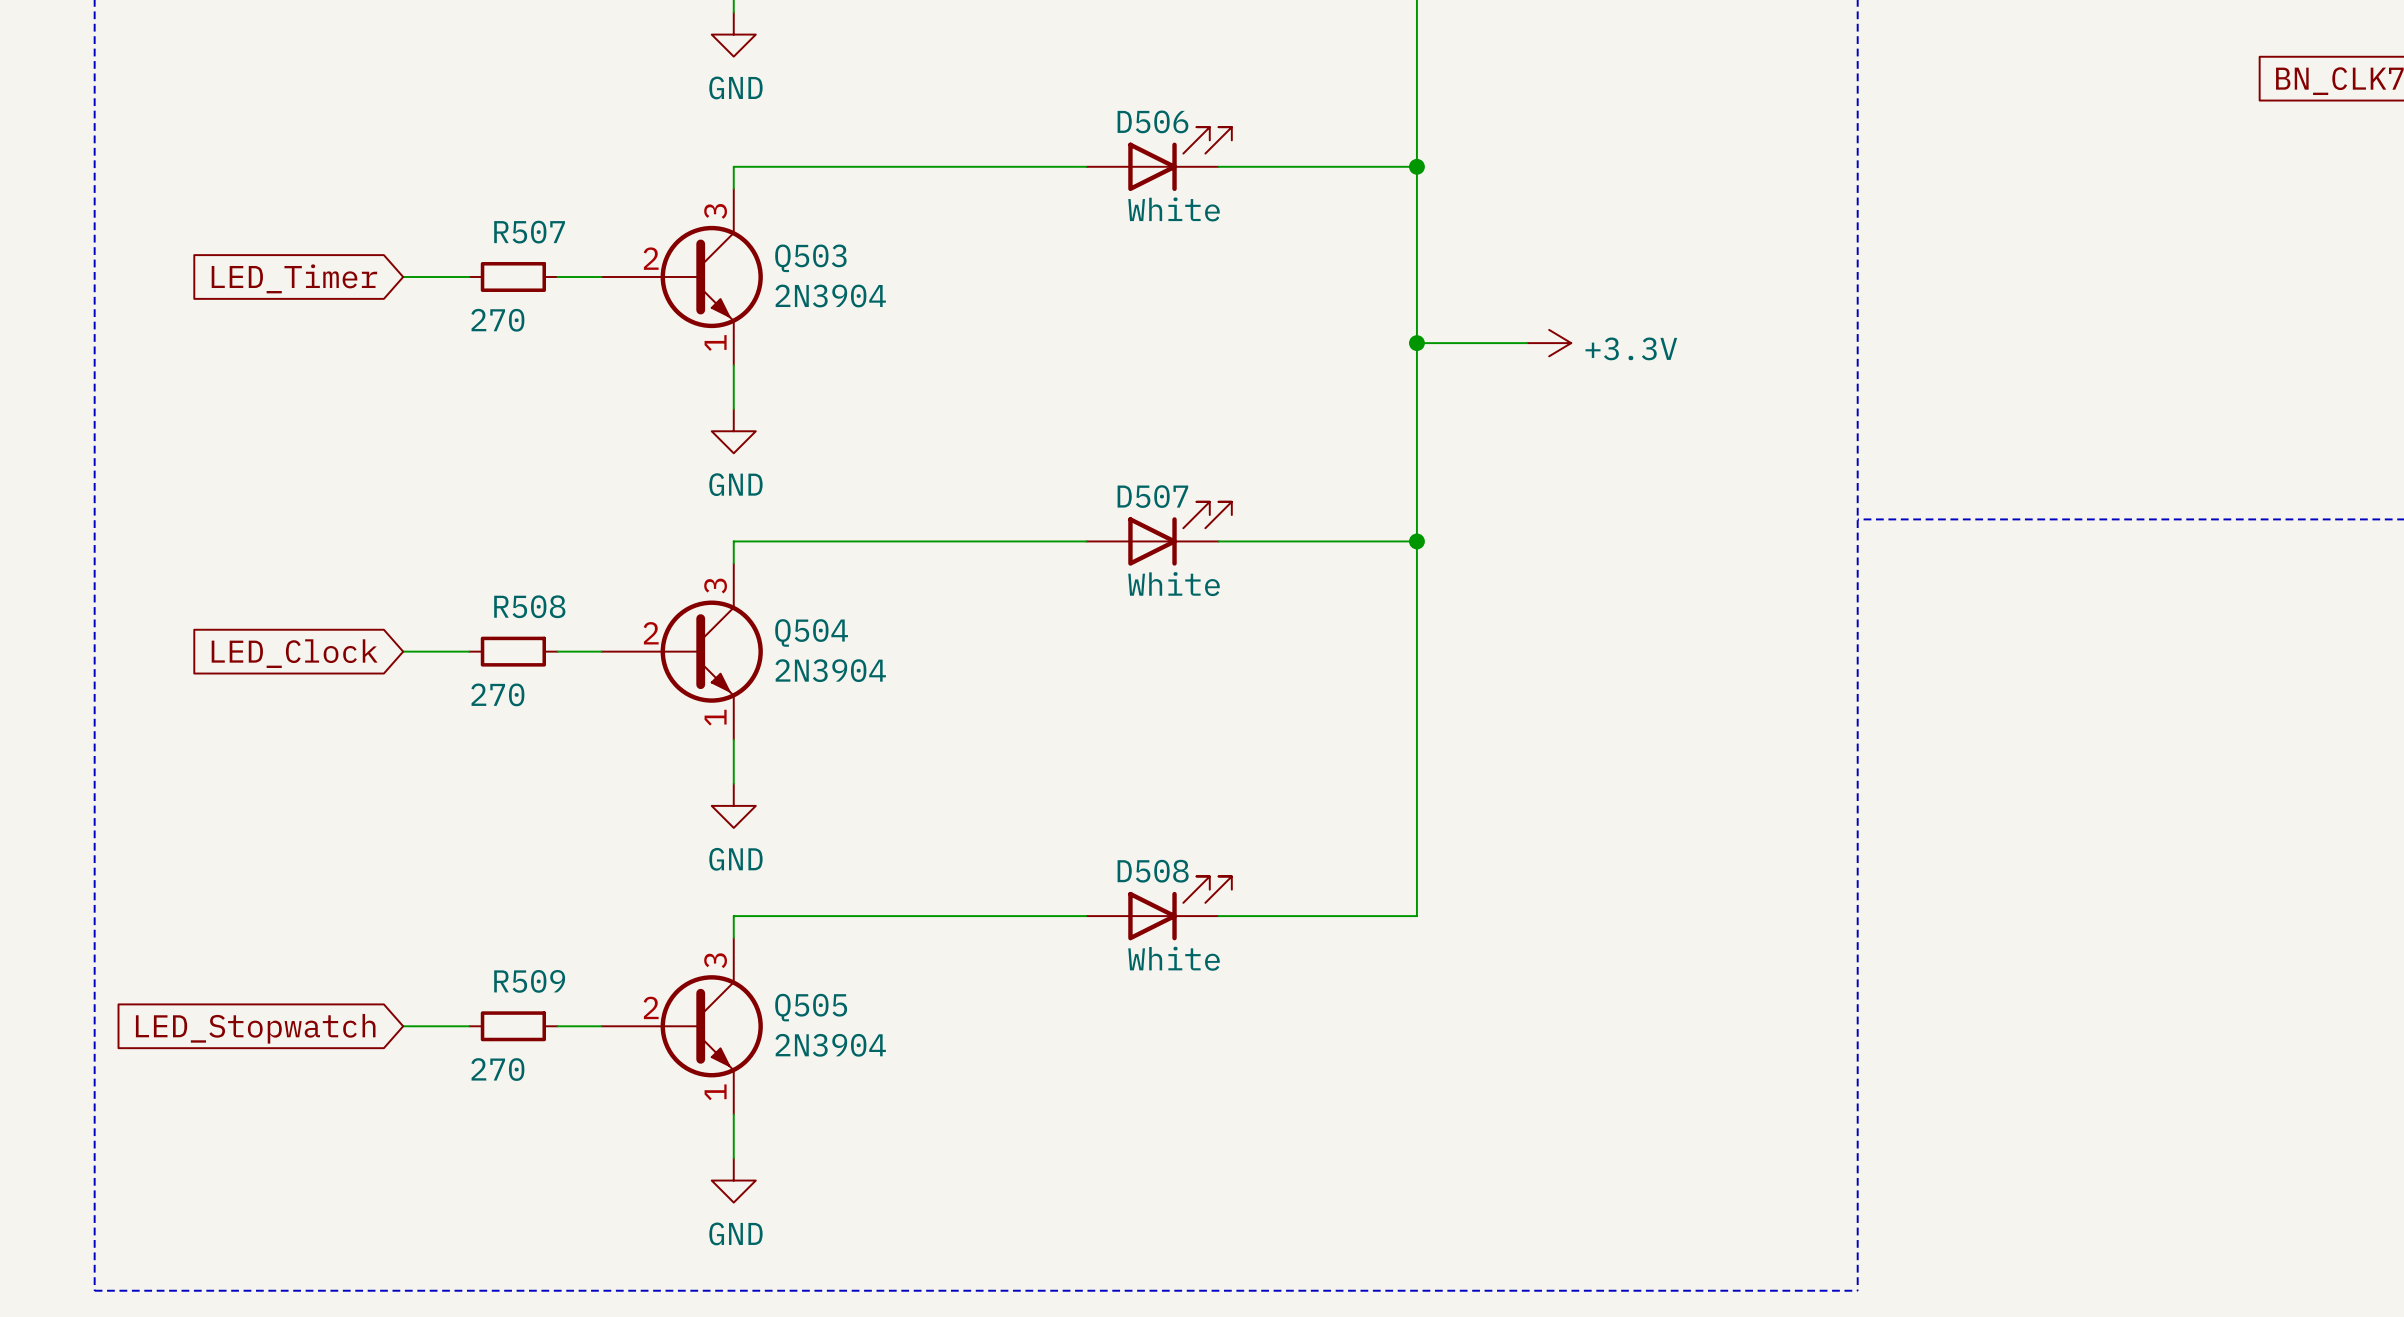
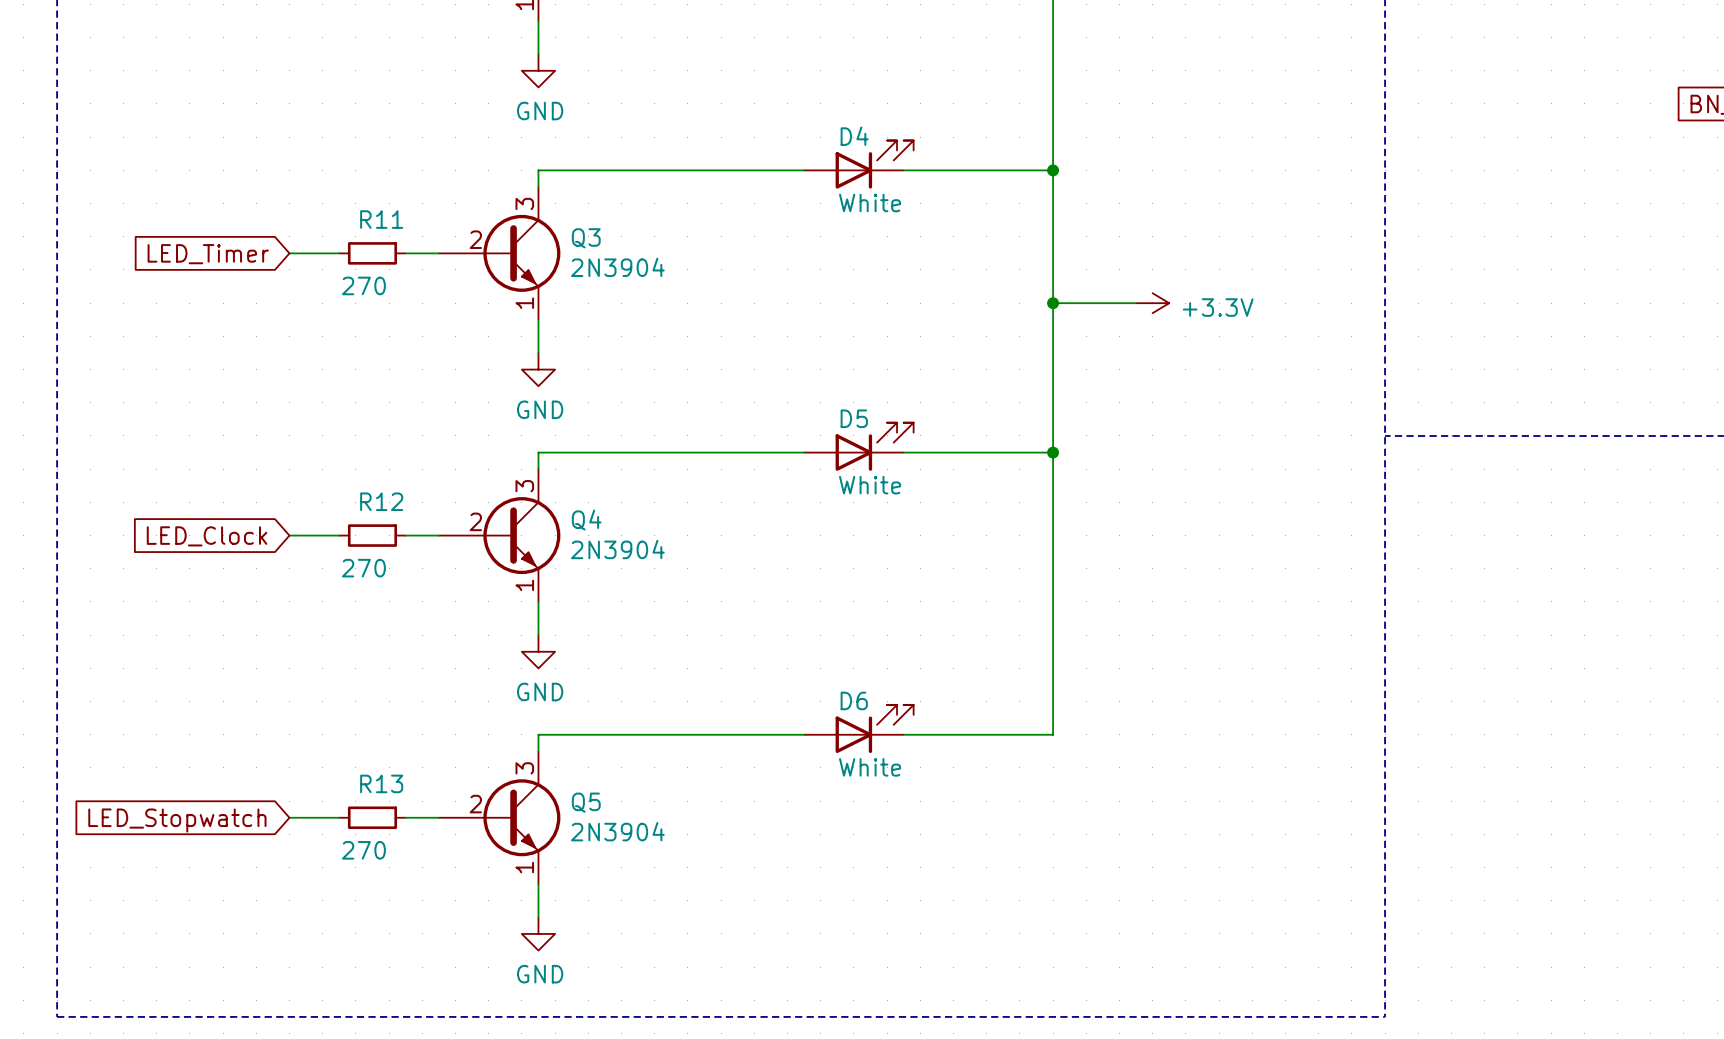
D506 name: D506 (1152, 121) -> D4 (854, 136)
R507 name: R507 (529, 232) -> R11 (381, 219)
Q503 name: Q503 (810, 258) -> Q3 (586, 238)
D507 name: D507 (1152, 496) -> D5 (854, 418)
R508 name: R508 (529, 606) -> R12 (381, 501)
Q504 name: Q504 (811, 632) -> Q4 (586, 520)
D508 name: D508 (1153, 871) -> D6 (854, 700)
R509 name: R509 (529, 981) -> R13 (381, 783)
Q505 name: Q505 (811, 1007) -> Q5 (586, 802)

